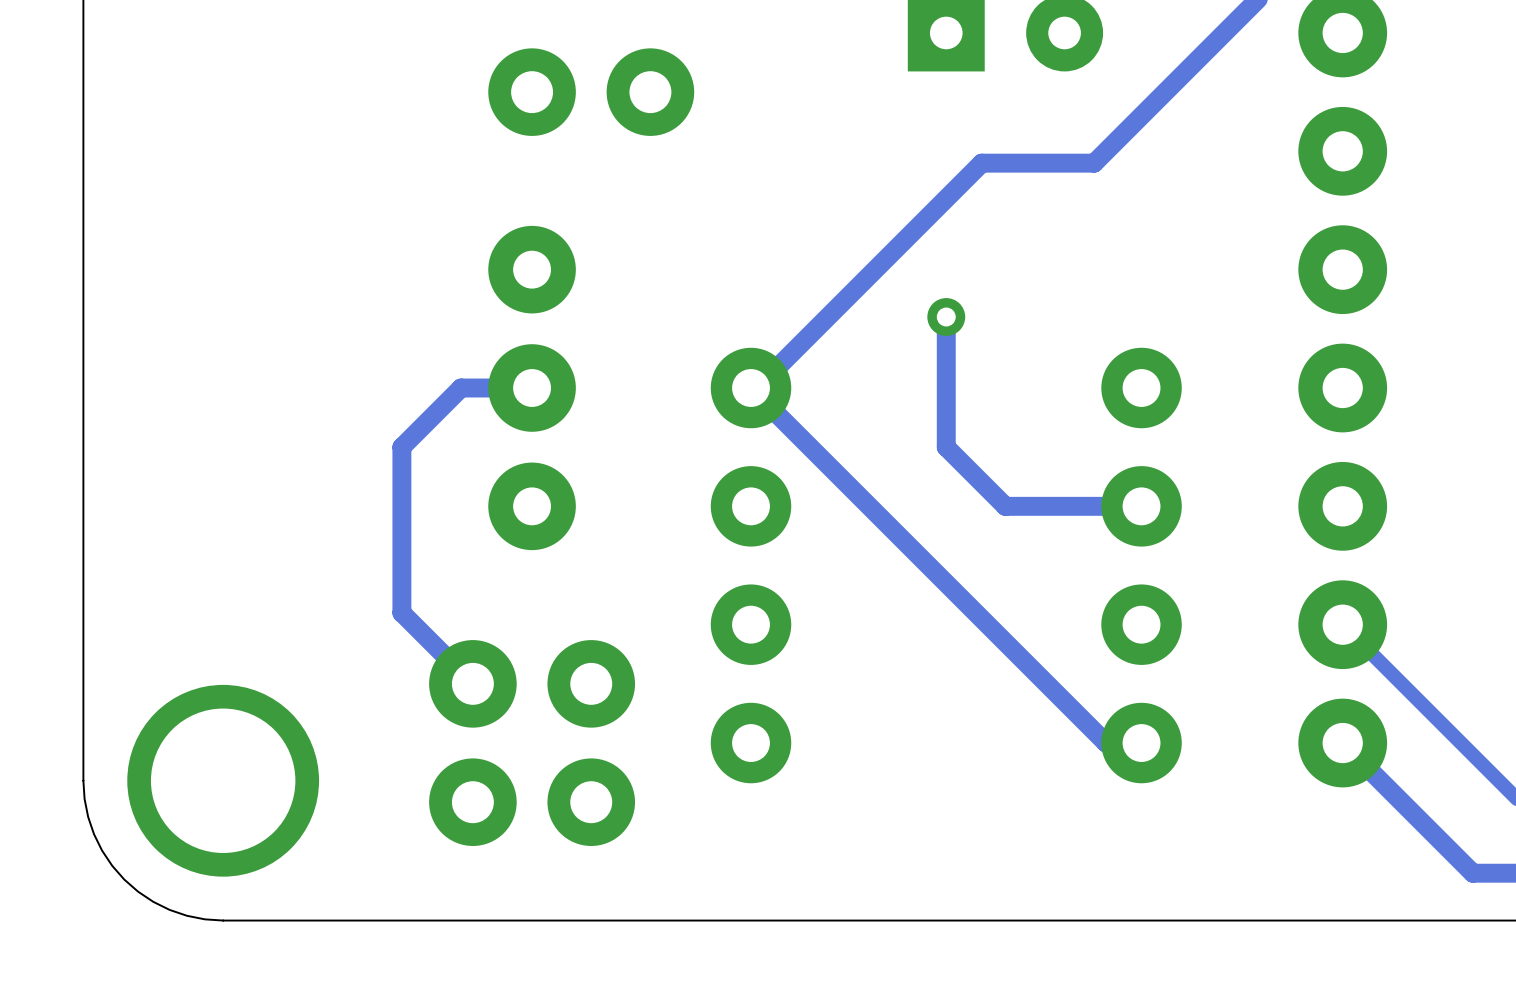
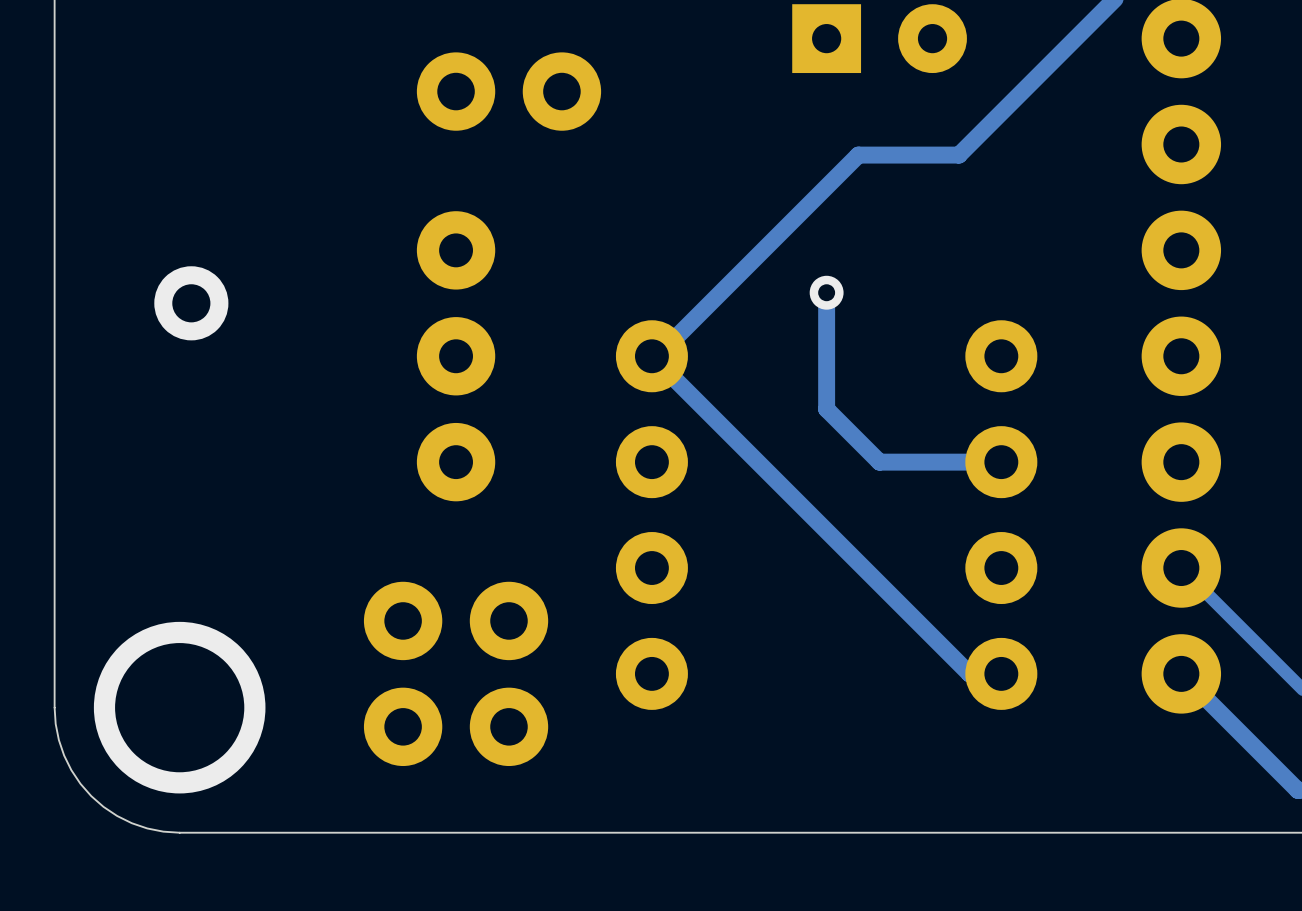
via: none -> (191, 303)
track: (532, 388) (461, 388) (401, 447) (401, 612) (472, 683) -> none

